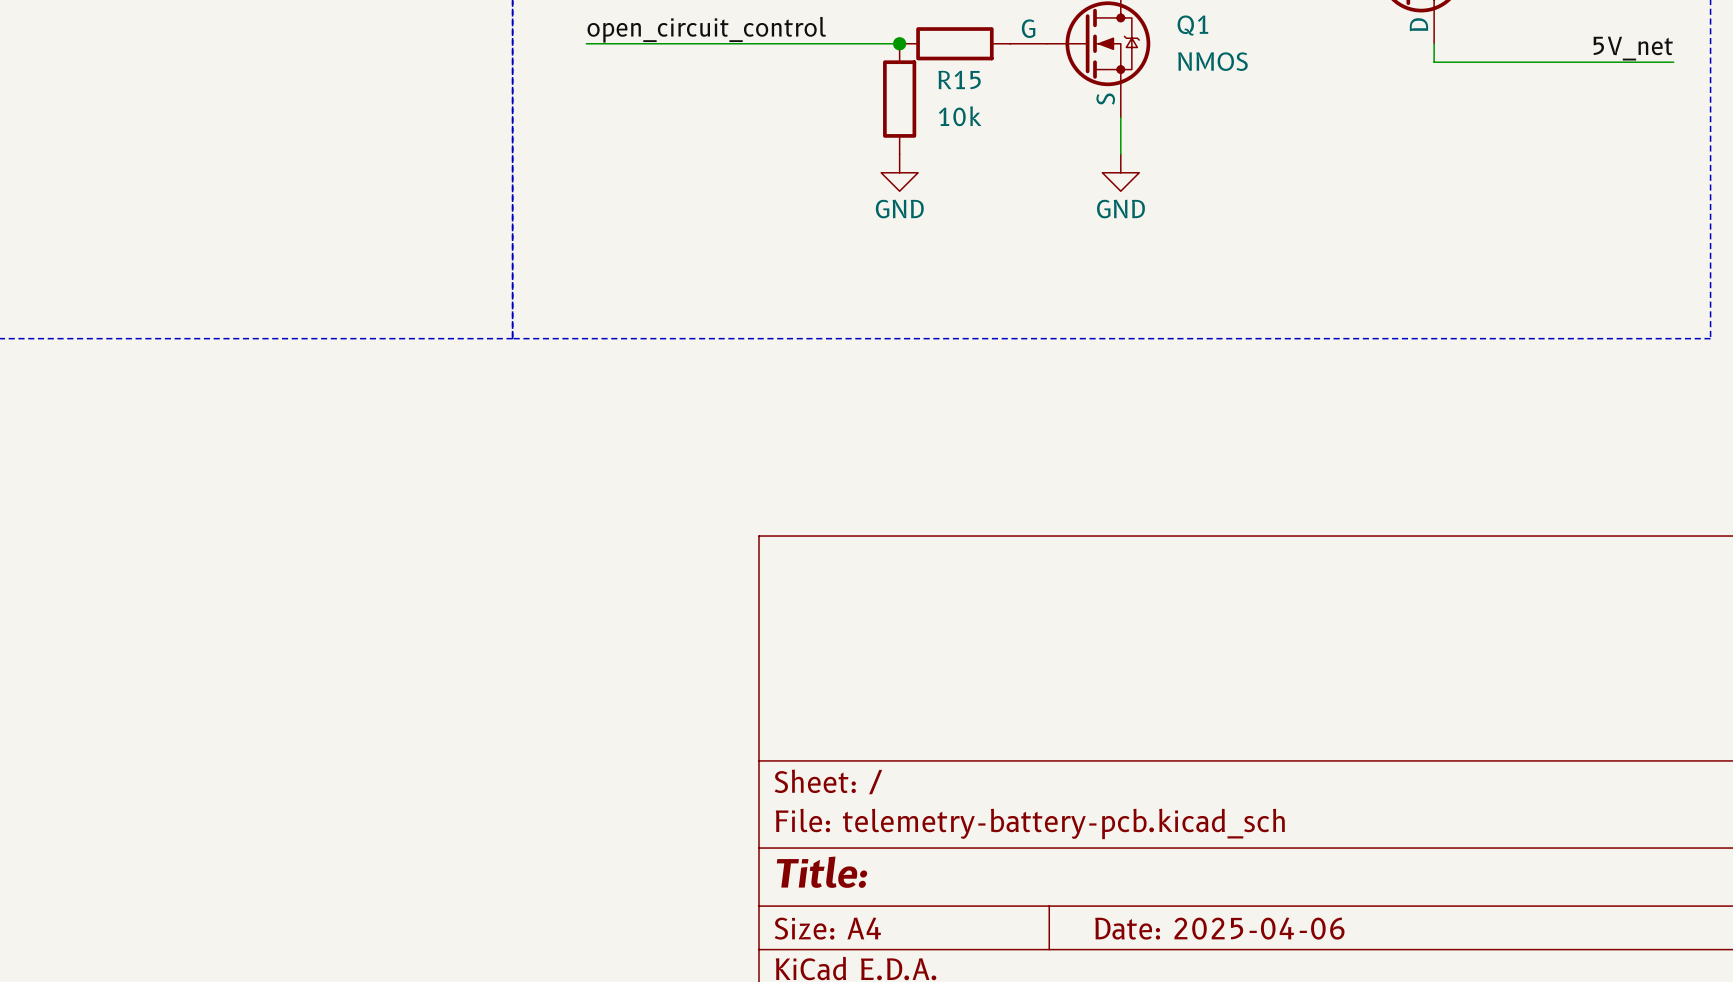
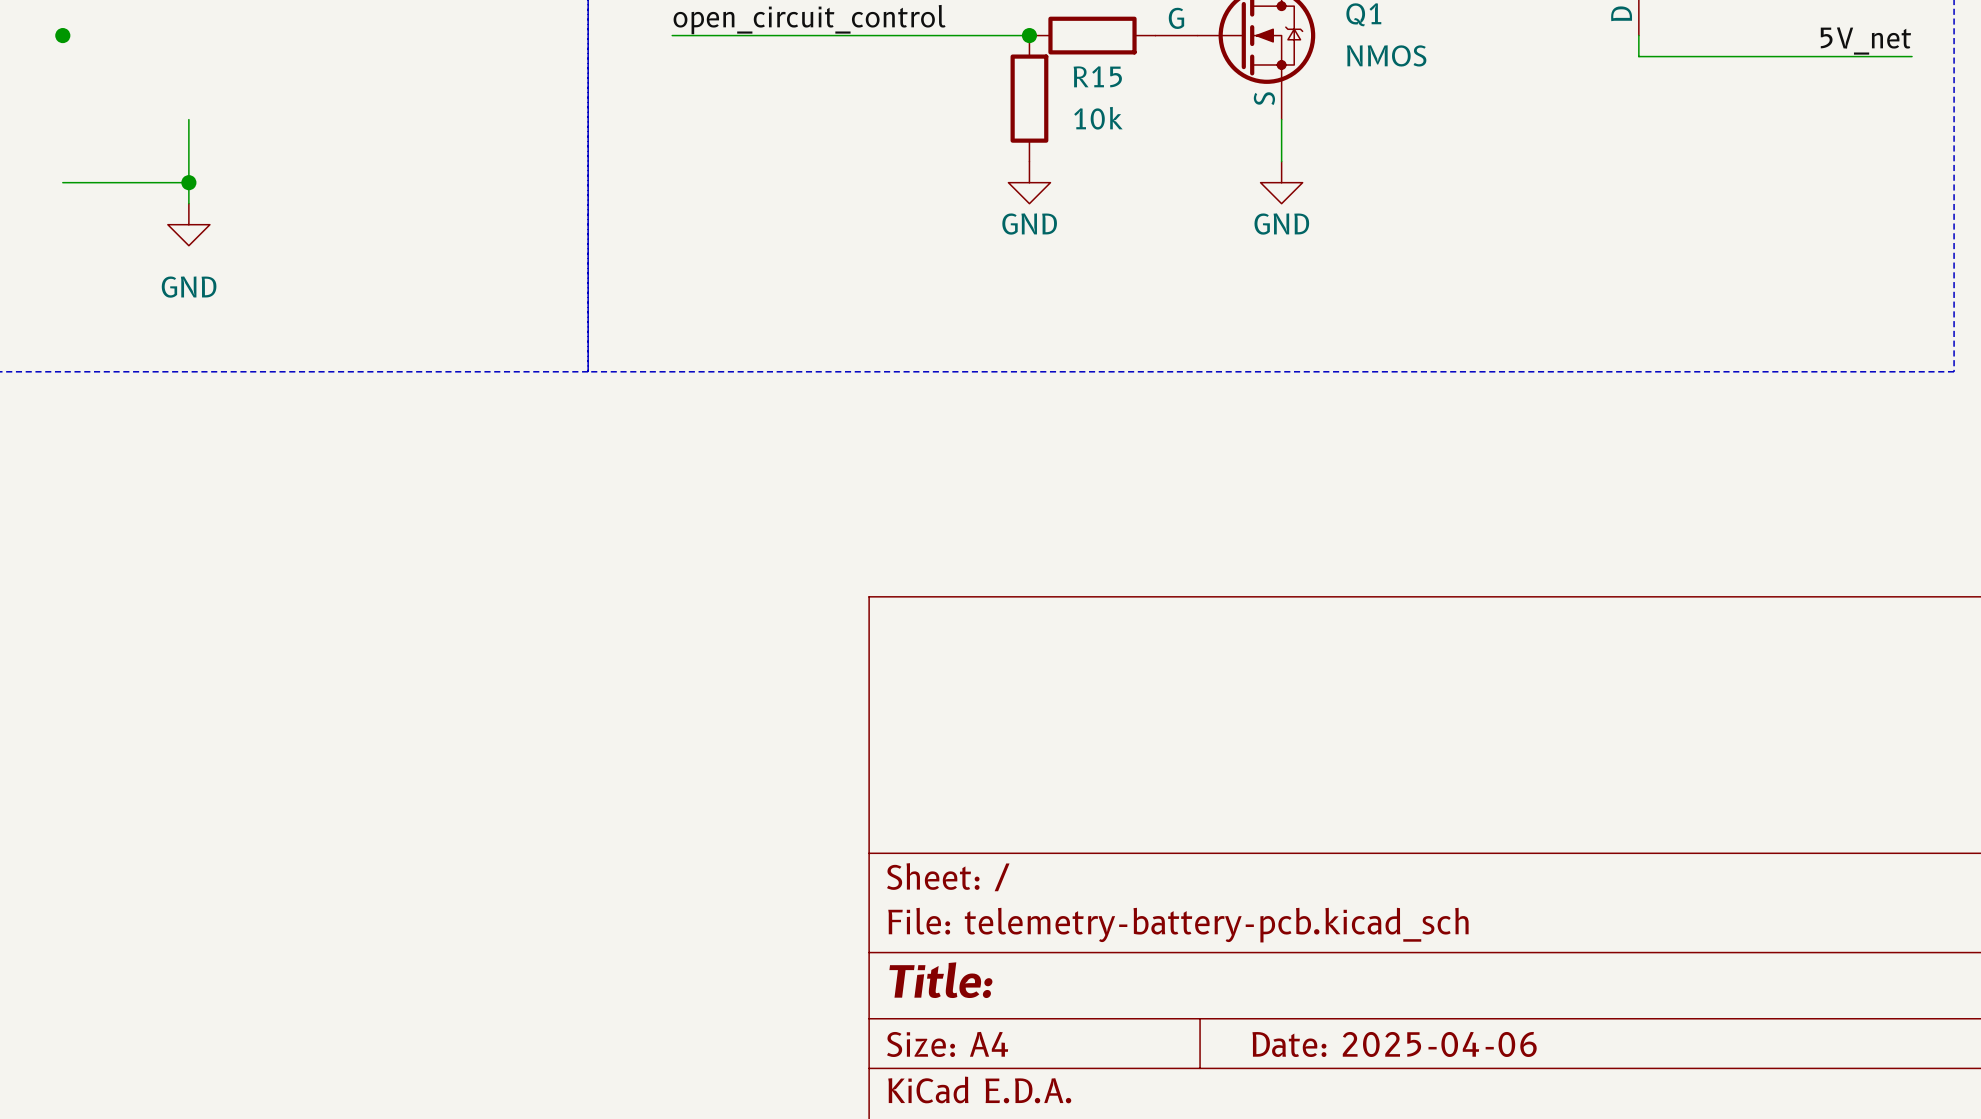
junction: none -> (62, 35)
wire: none -> (188, 119) (188, 203)
wire: none -> (62, 182) (188, 182)
junction: none -> (188, 182)
power symbol: none -> GND (188, 224)

